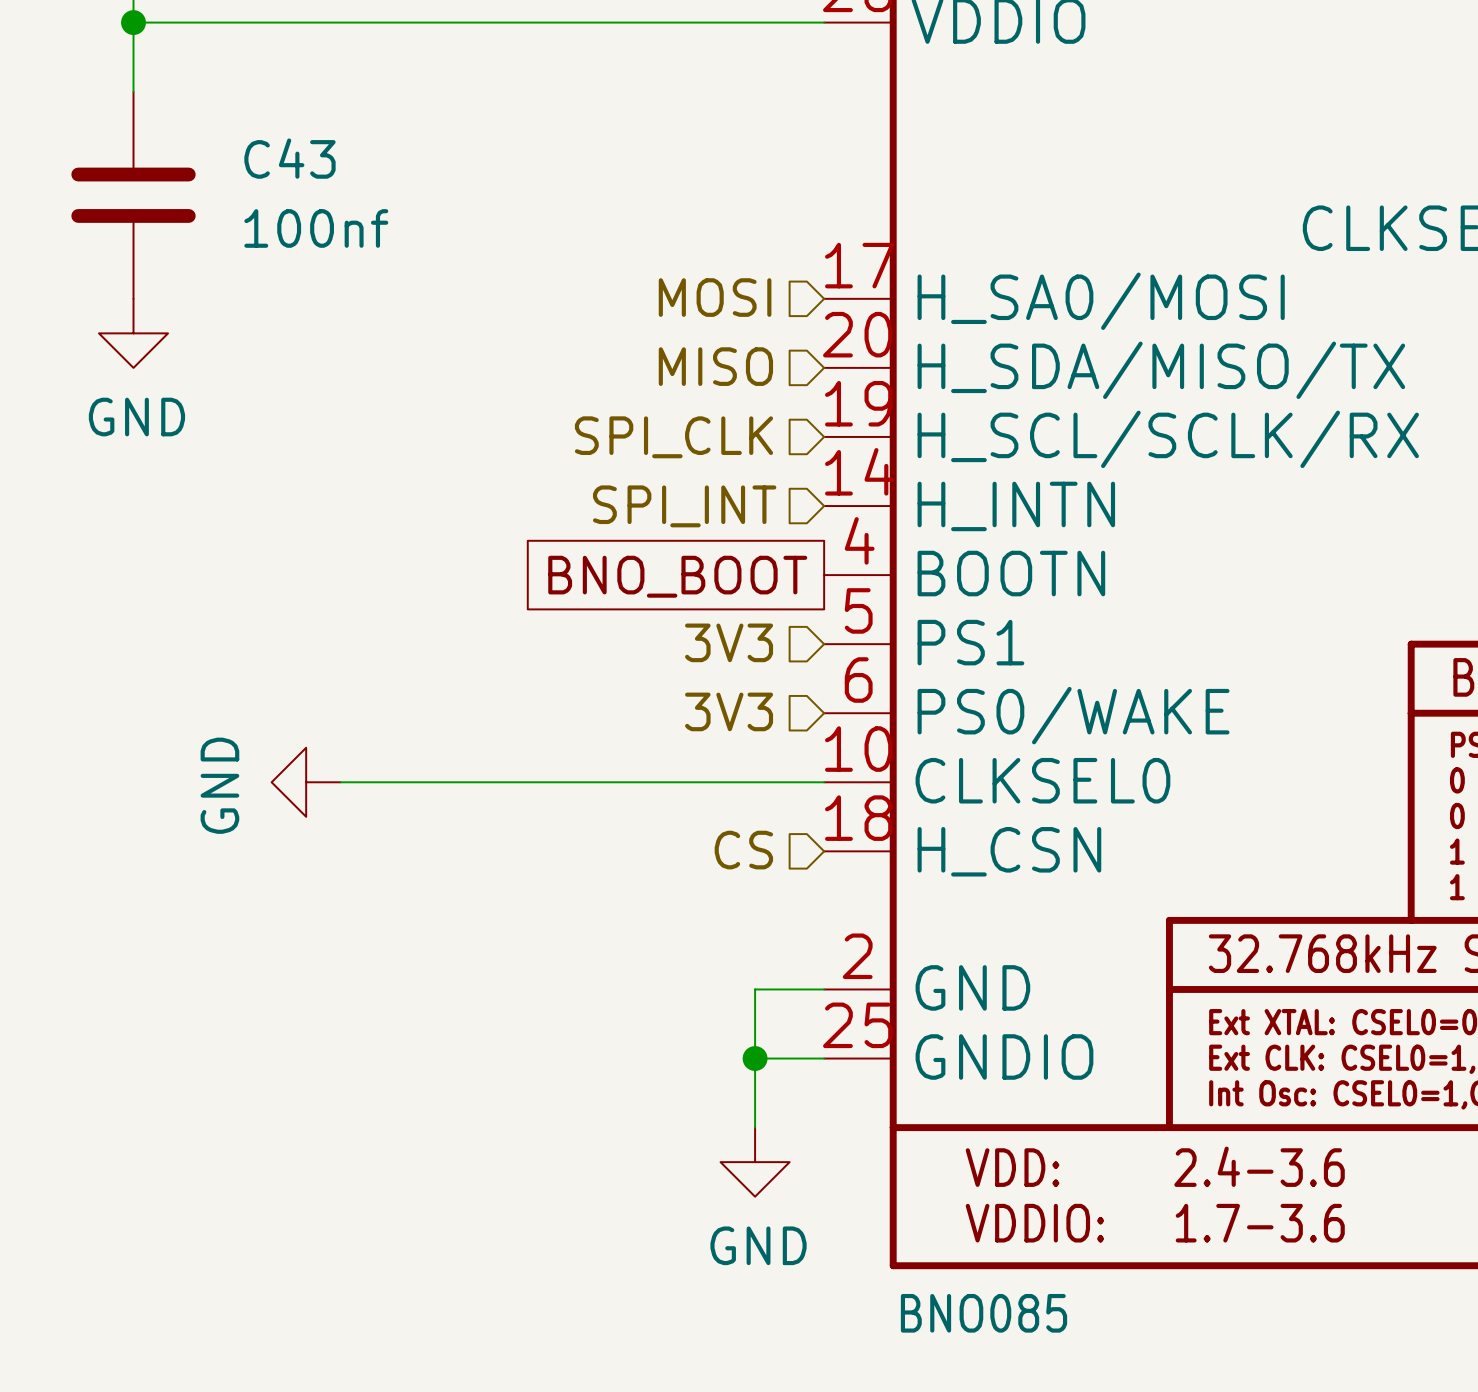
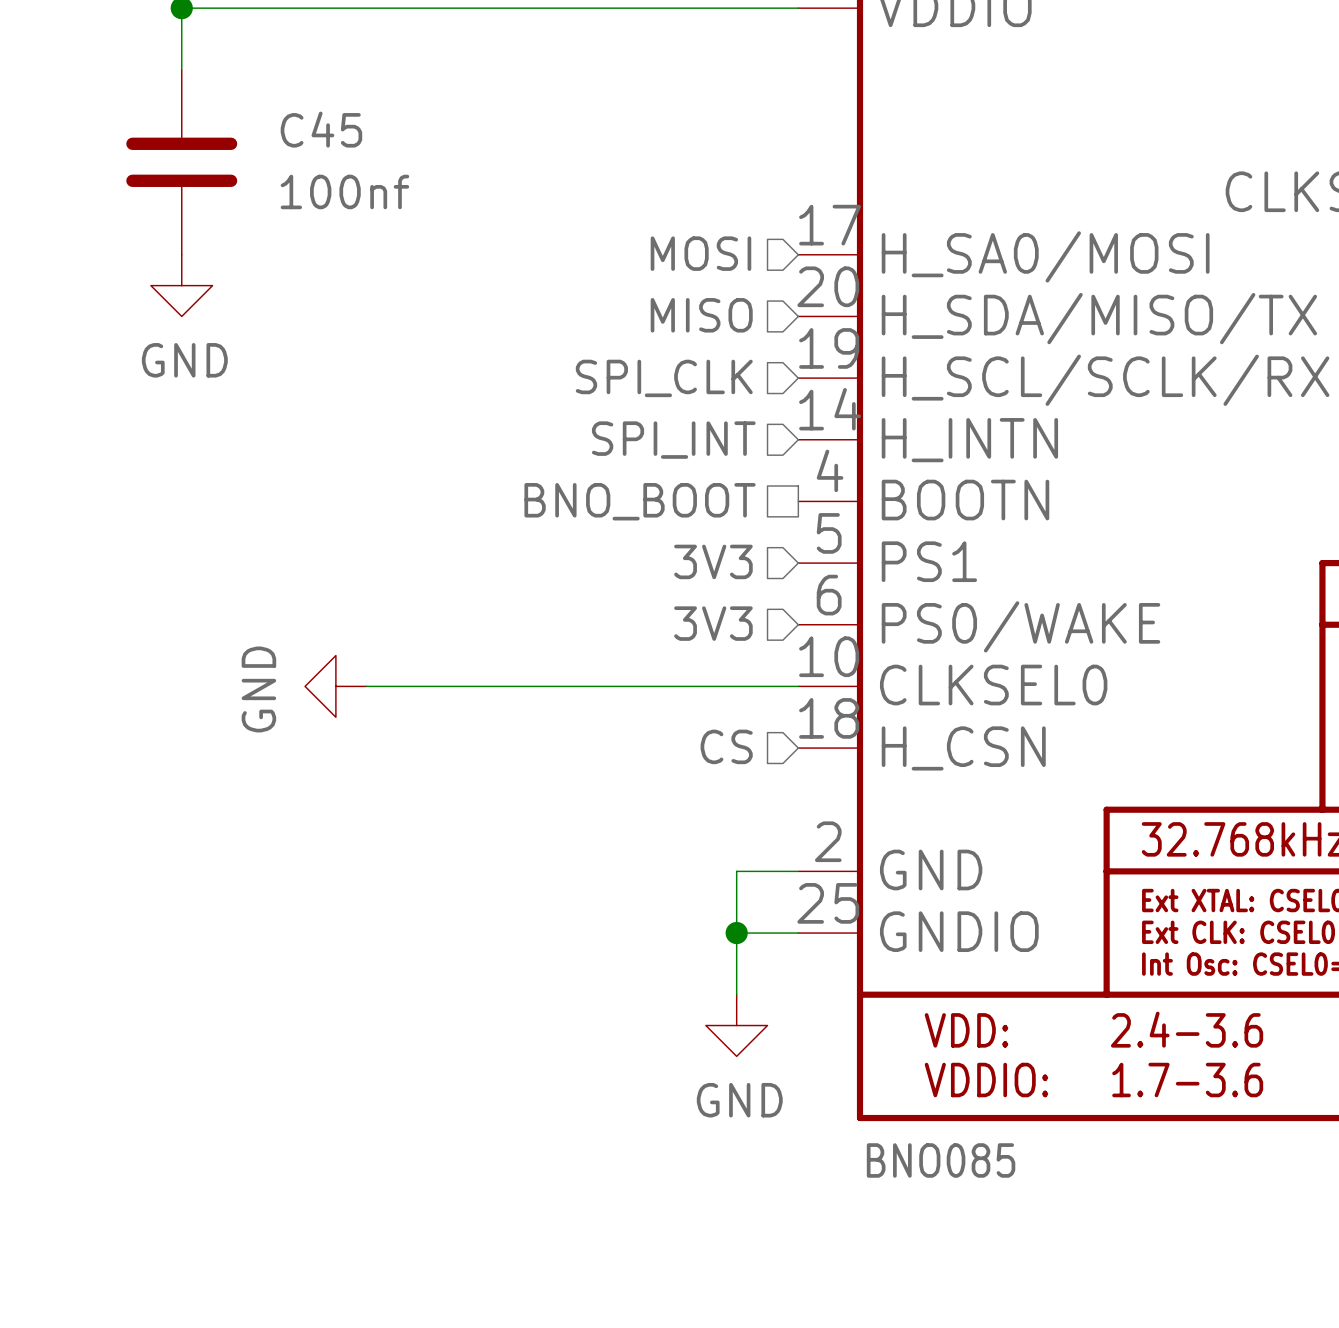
C43 name: C43 (289, 158) -> C45 (321, 129)
hierarchical label: none -> BNO_BOOT (640, 501)
global label: BNO_BOOT (677, 576) -> none

